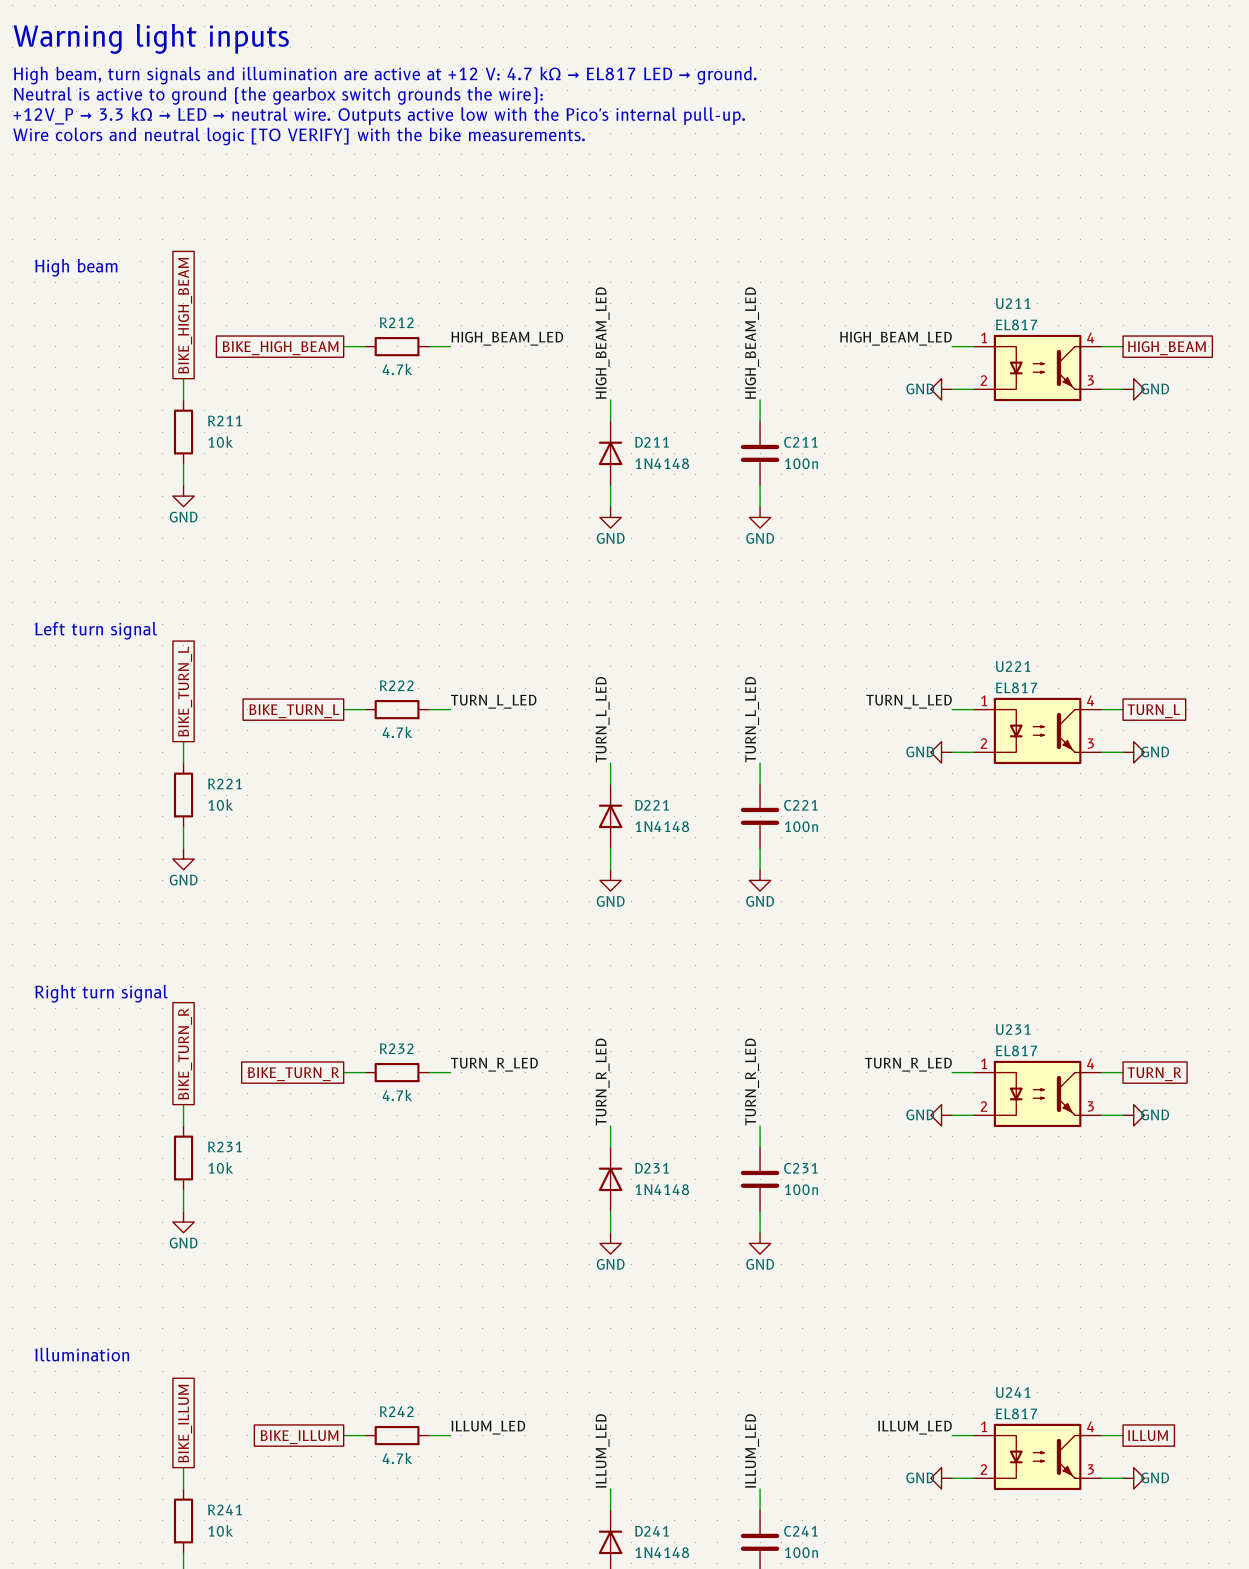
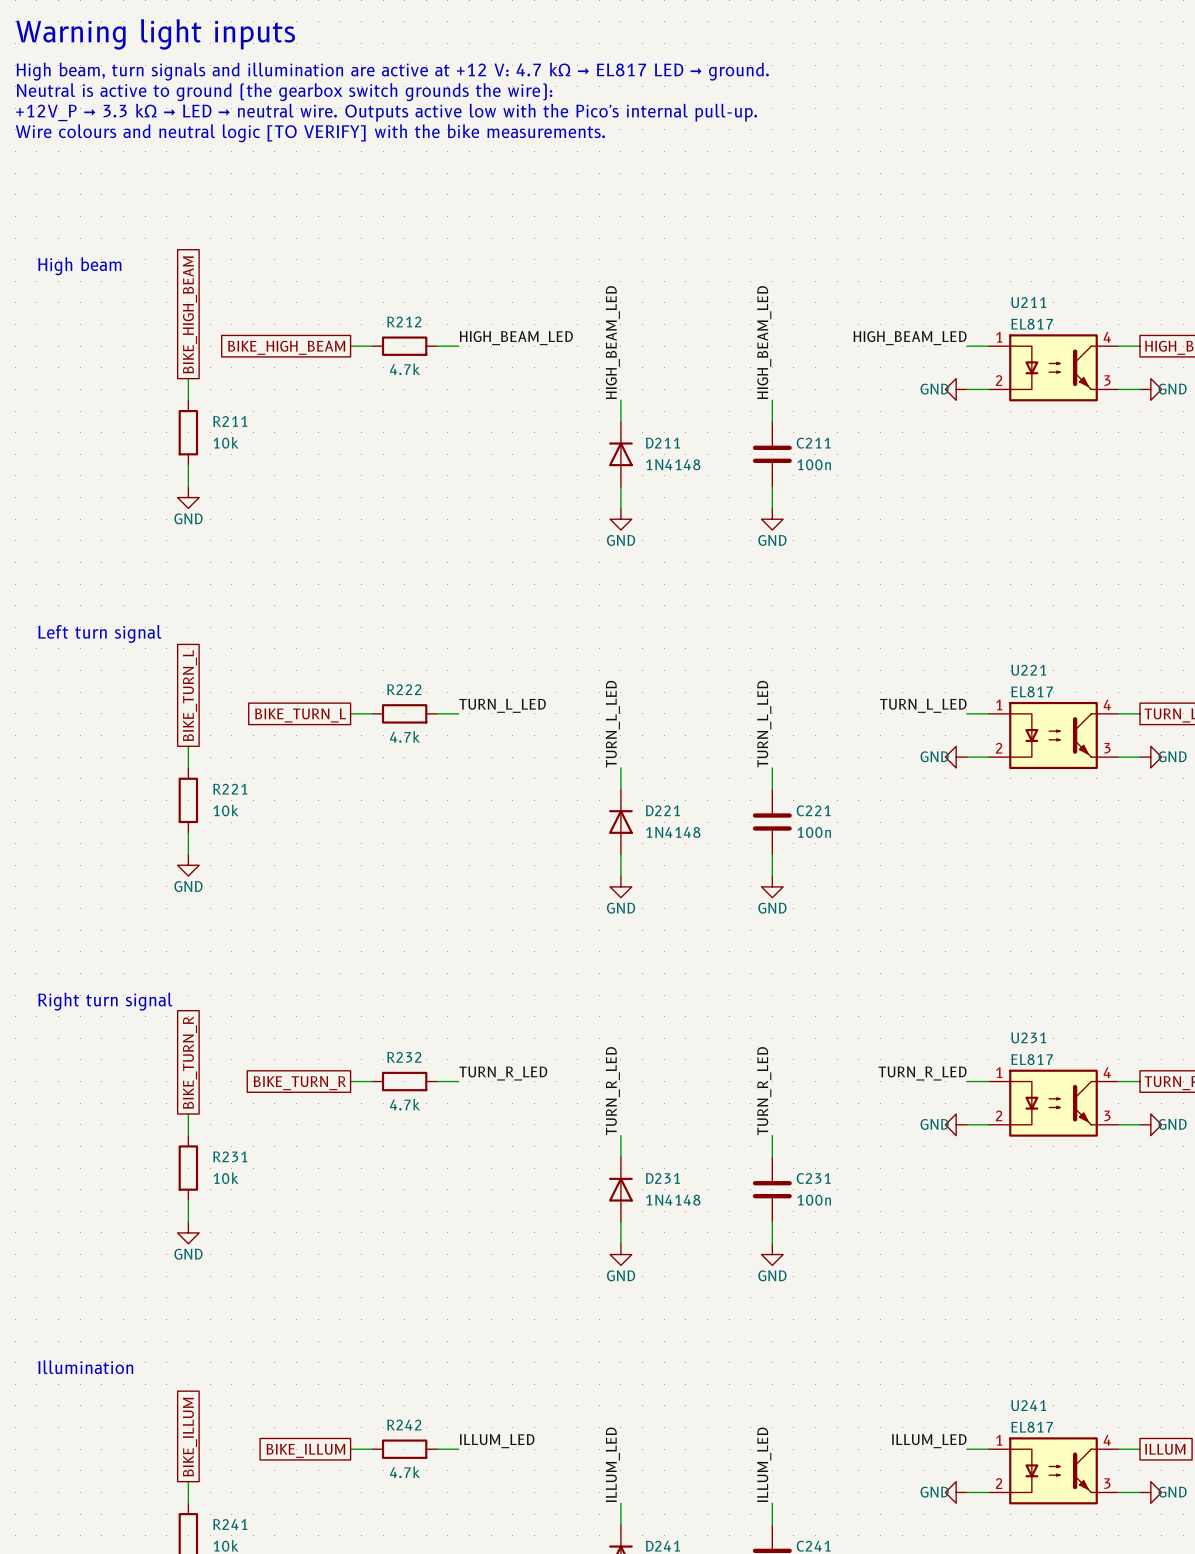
text: Wire colors and neutral logic [TO VERIFY] with the bike measurements. (299, 136) -> Wire colours and neutral logic [TO VERIFY] with the bike measurements. (310, 133)

